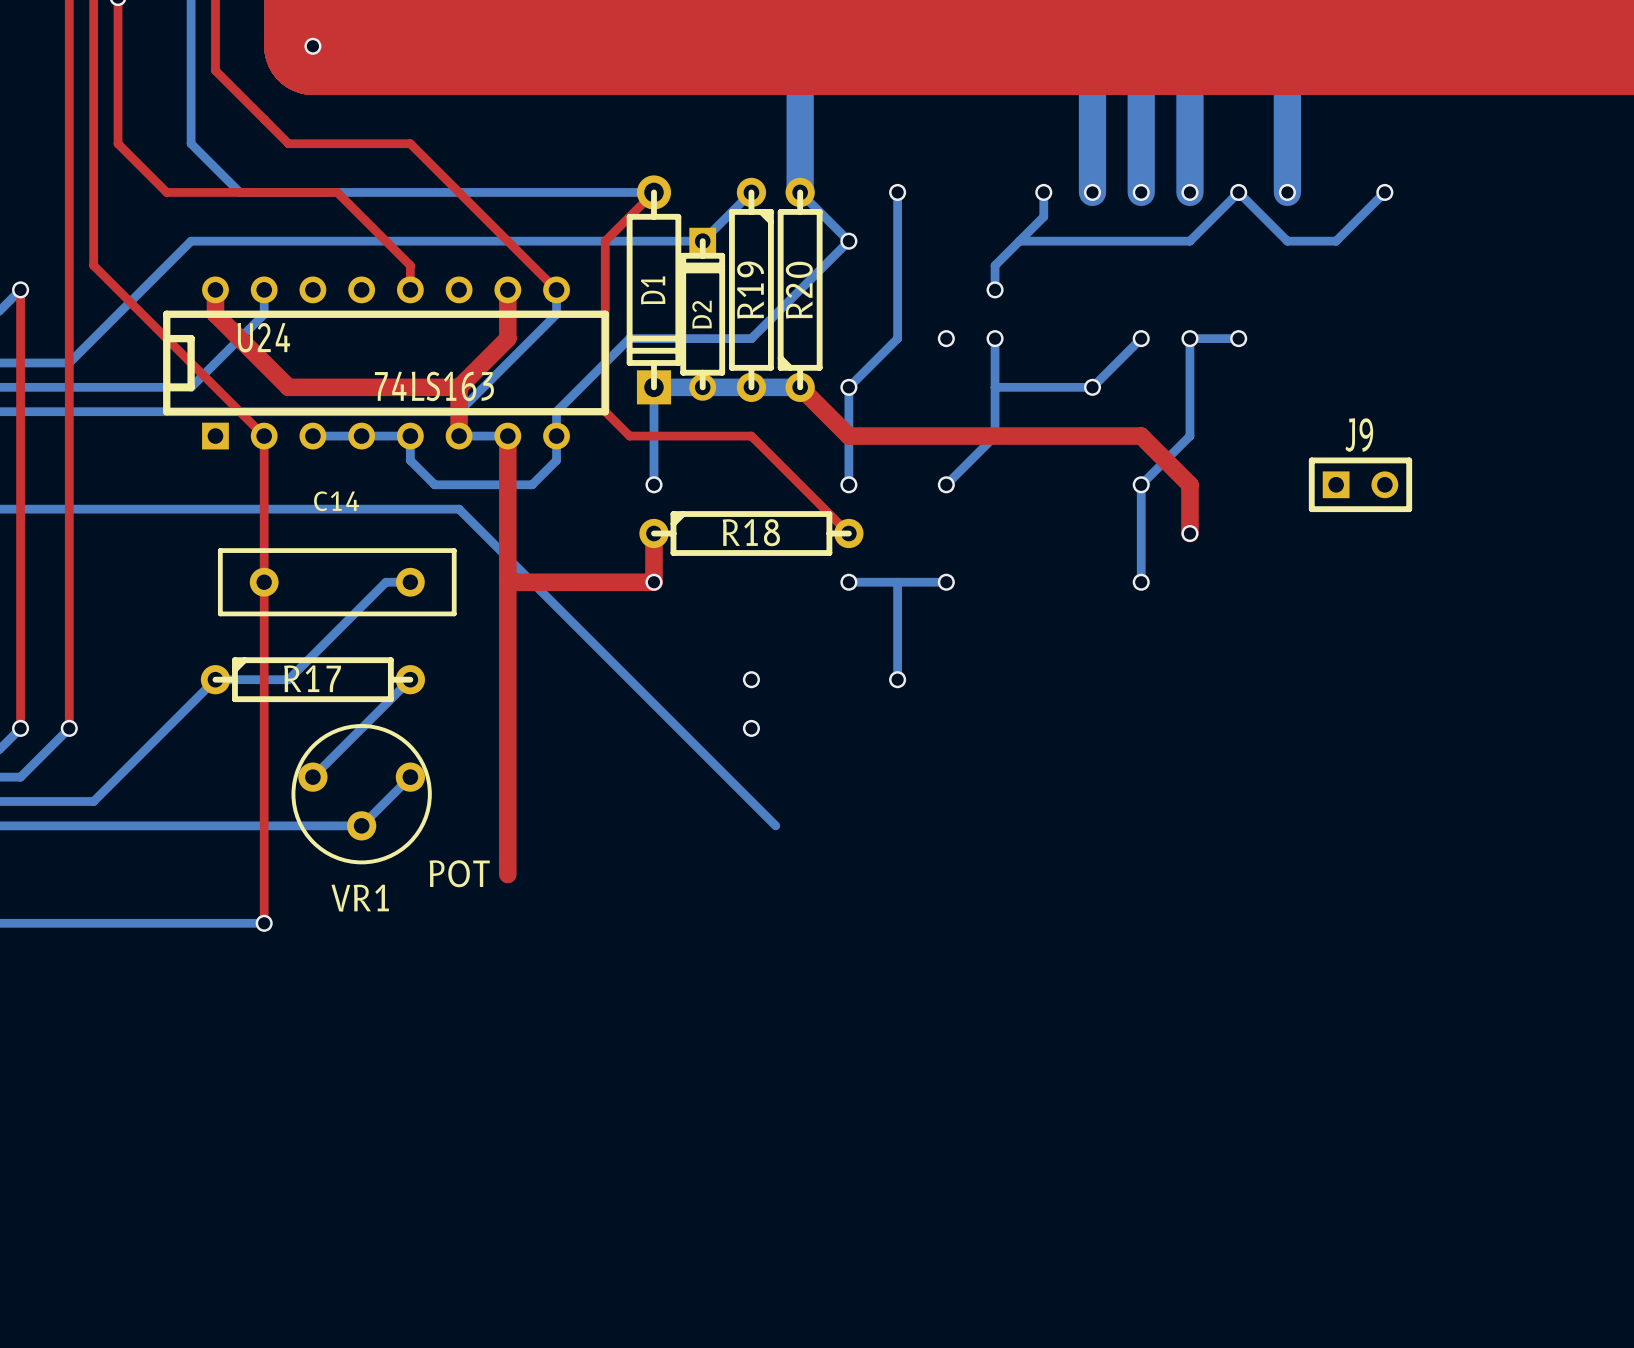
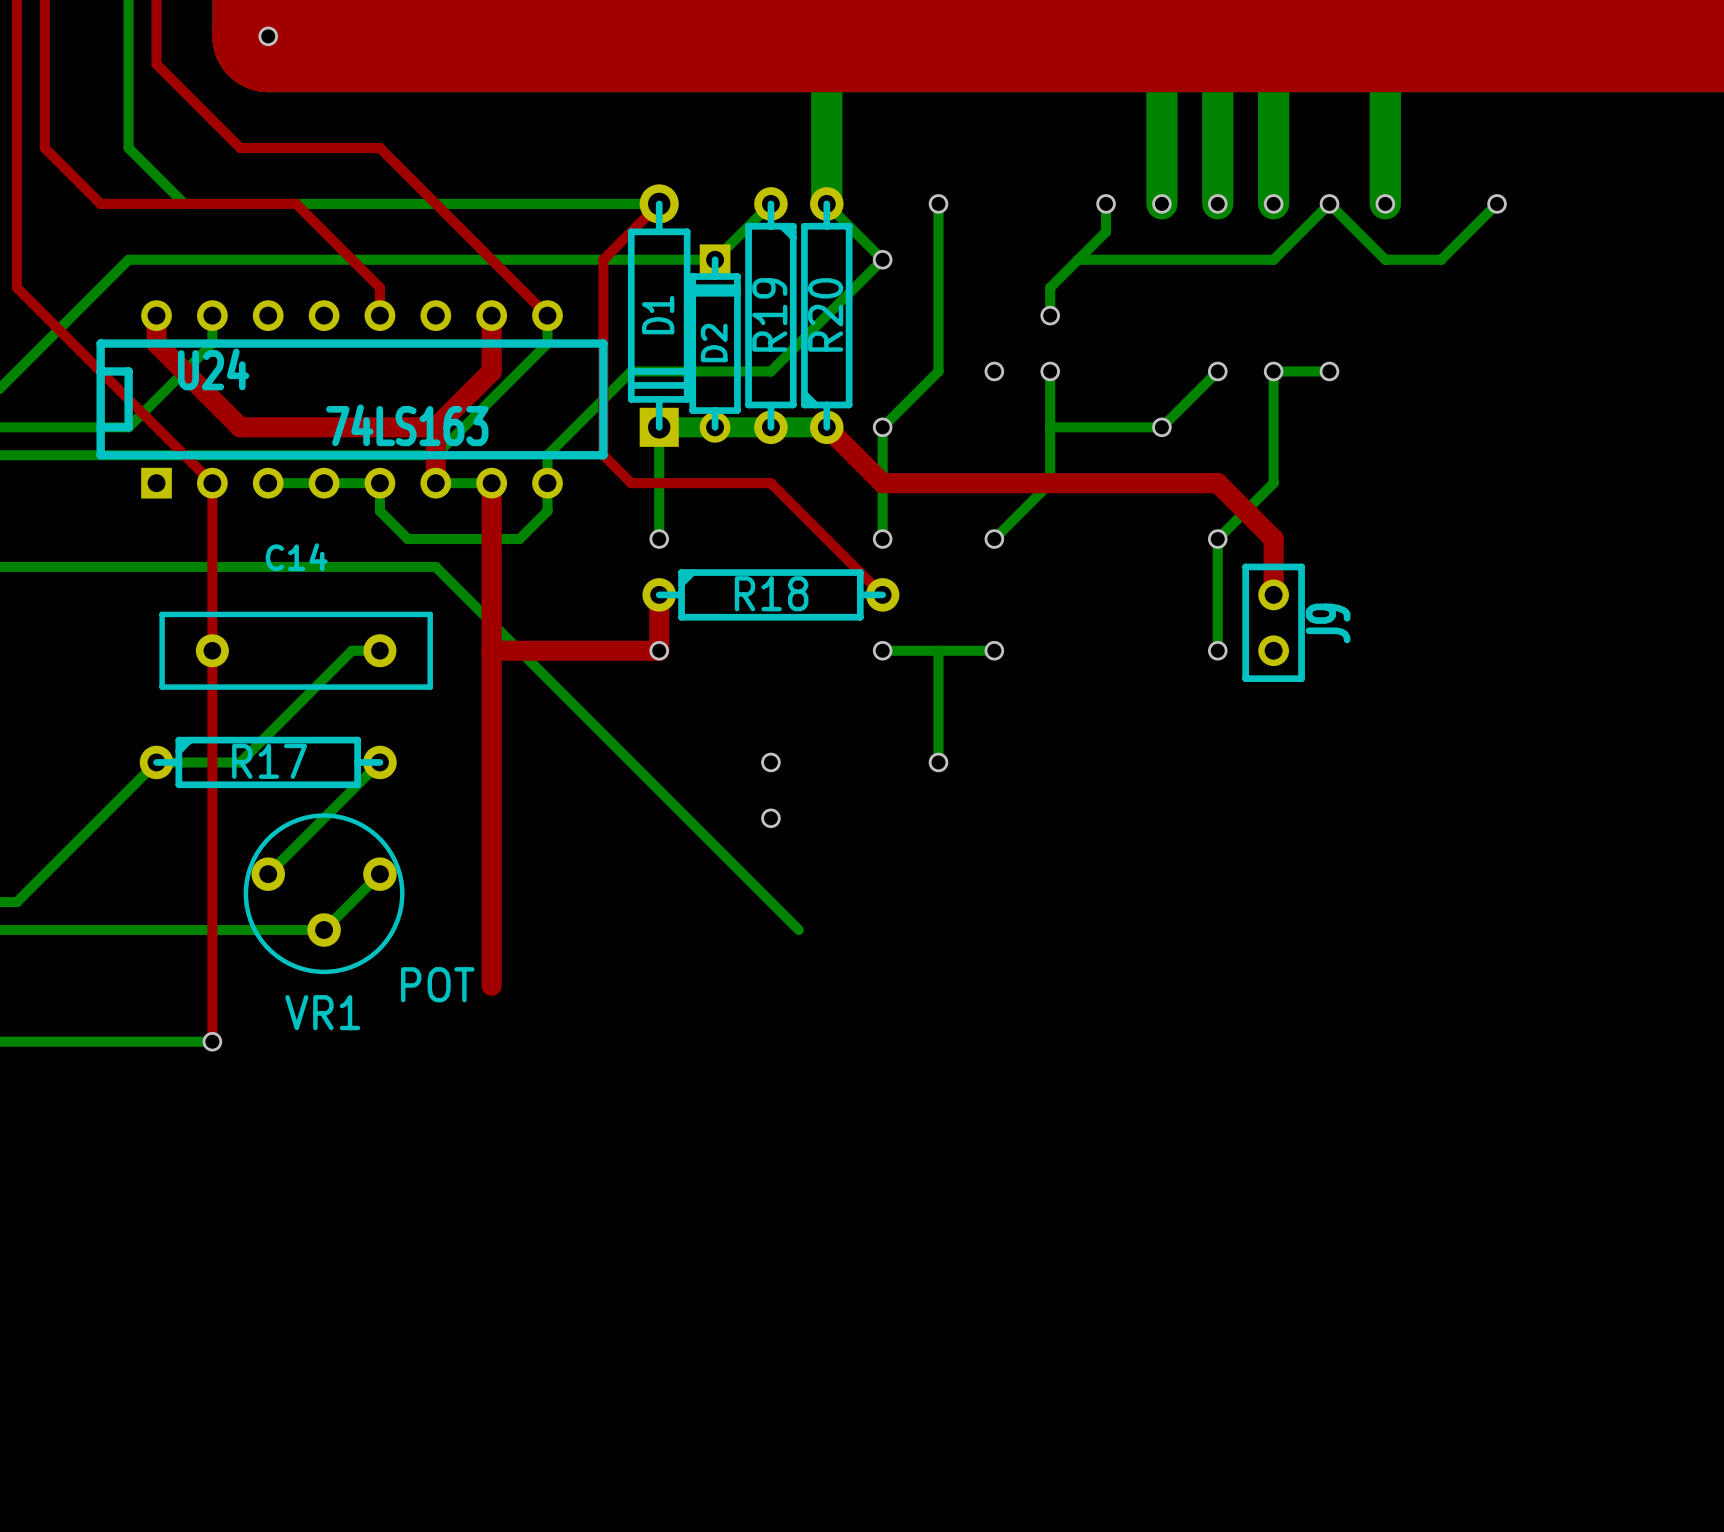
J9 name position: J9 (1359, 435) -> J9 (1328, 623)
J9 footprint: [1308, 457, 1413, 513] -> [1242, 563, 1305, 683]

